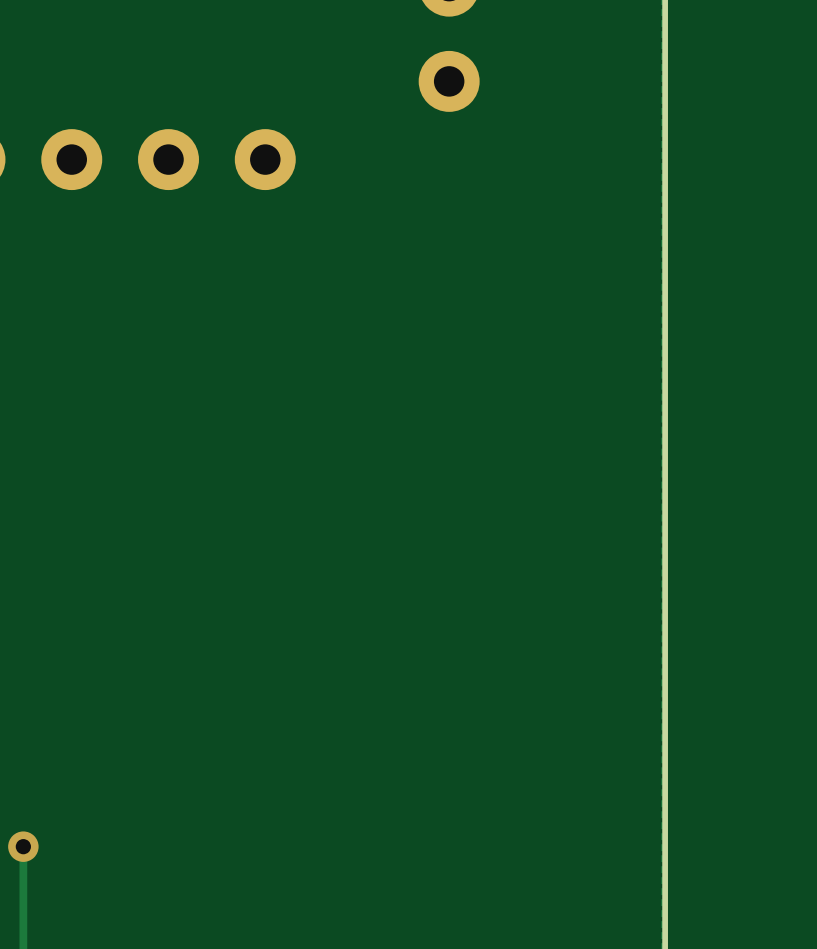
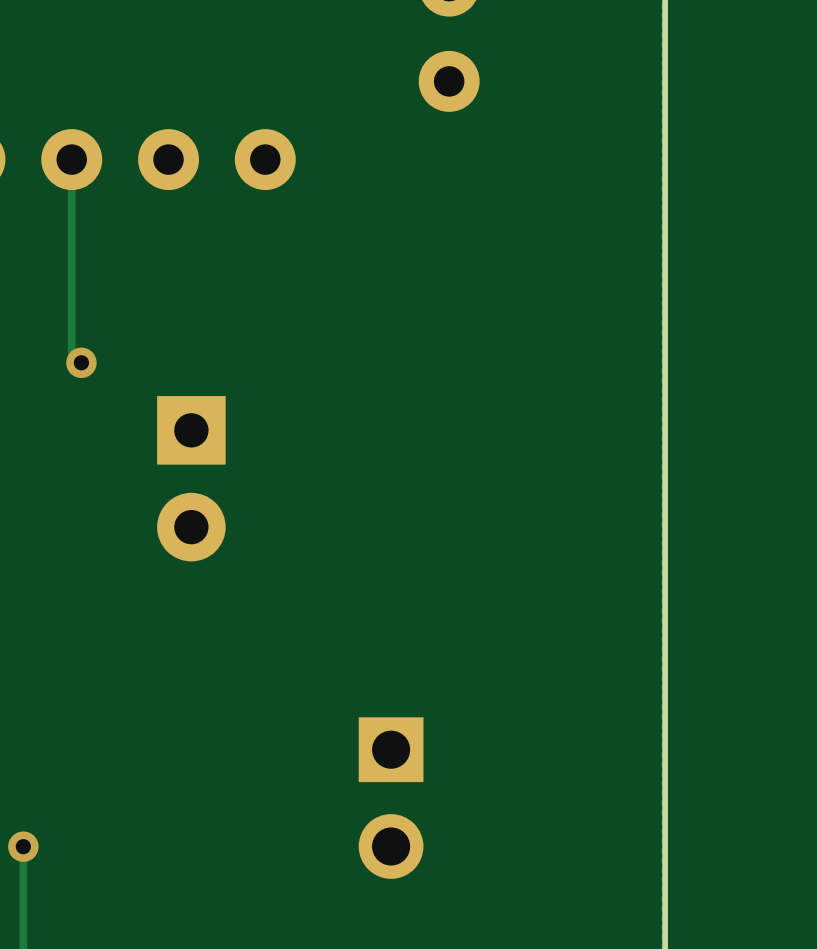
track: none -> (71, 159) (71, 353) (81, 362)
via: none -> (81, 362)
part: none -> (191, 478)
part: none -> (391, 798)

